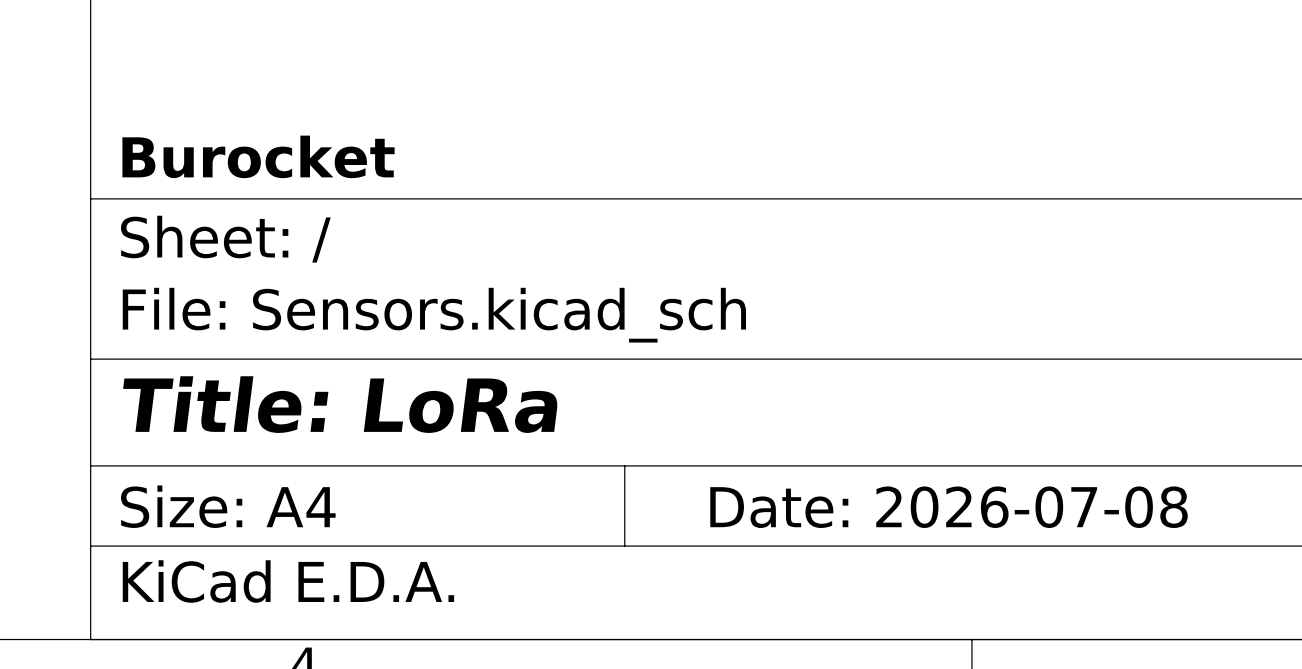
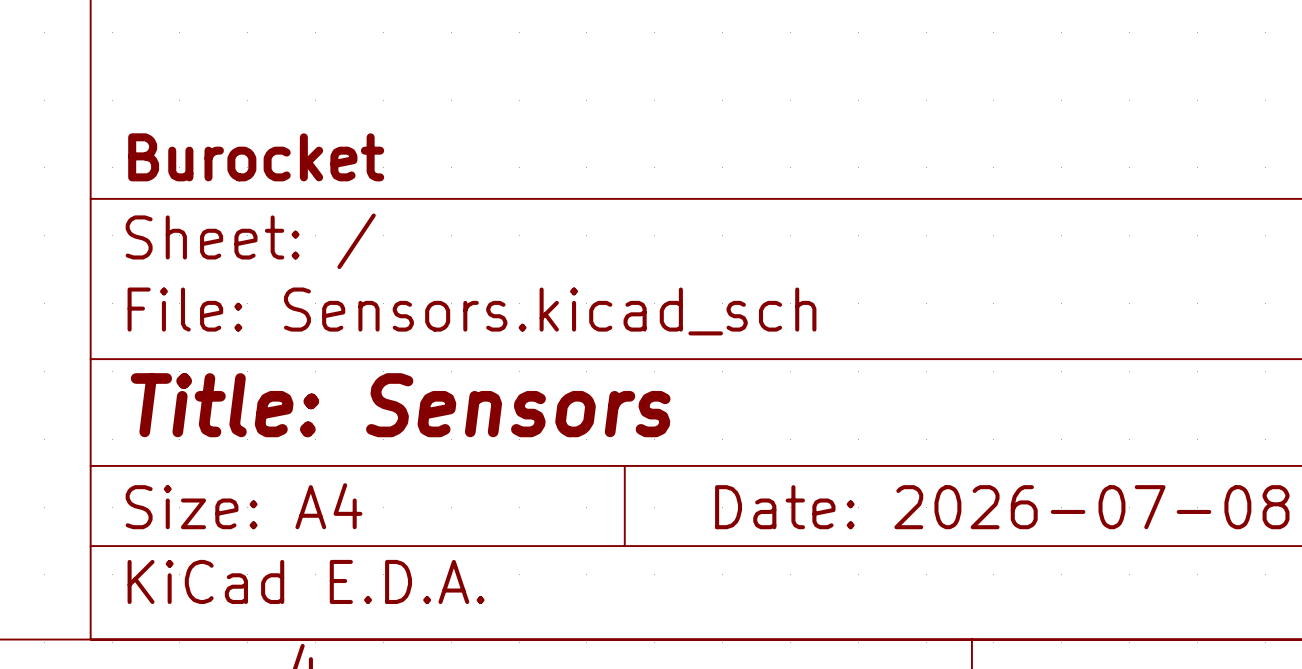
title block: Title: LoRa (340, 404) -> Title: Sensors (400, 405)

